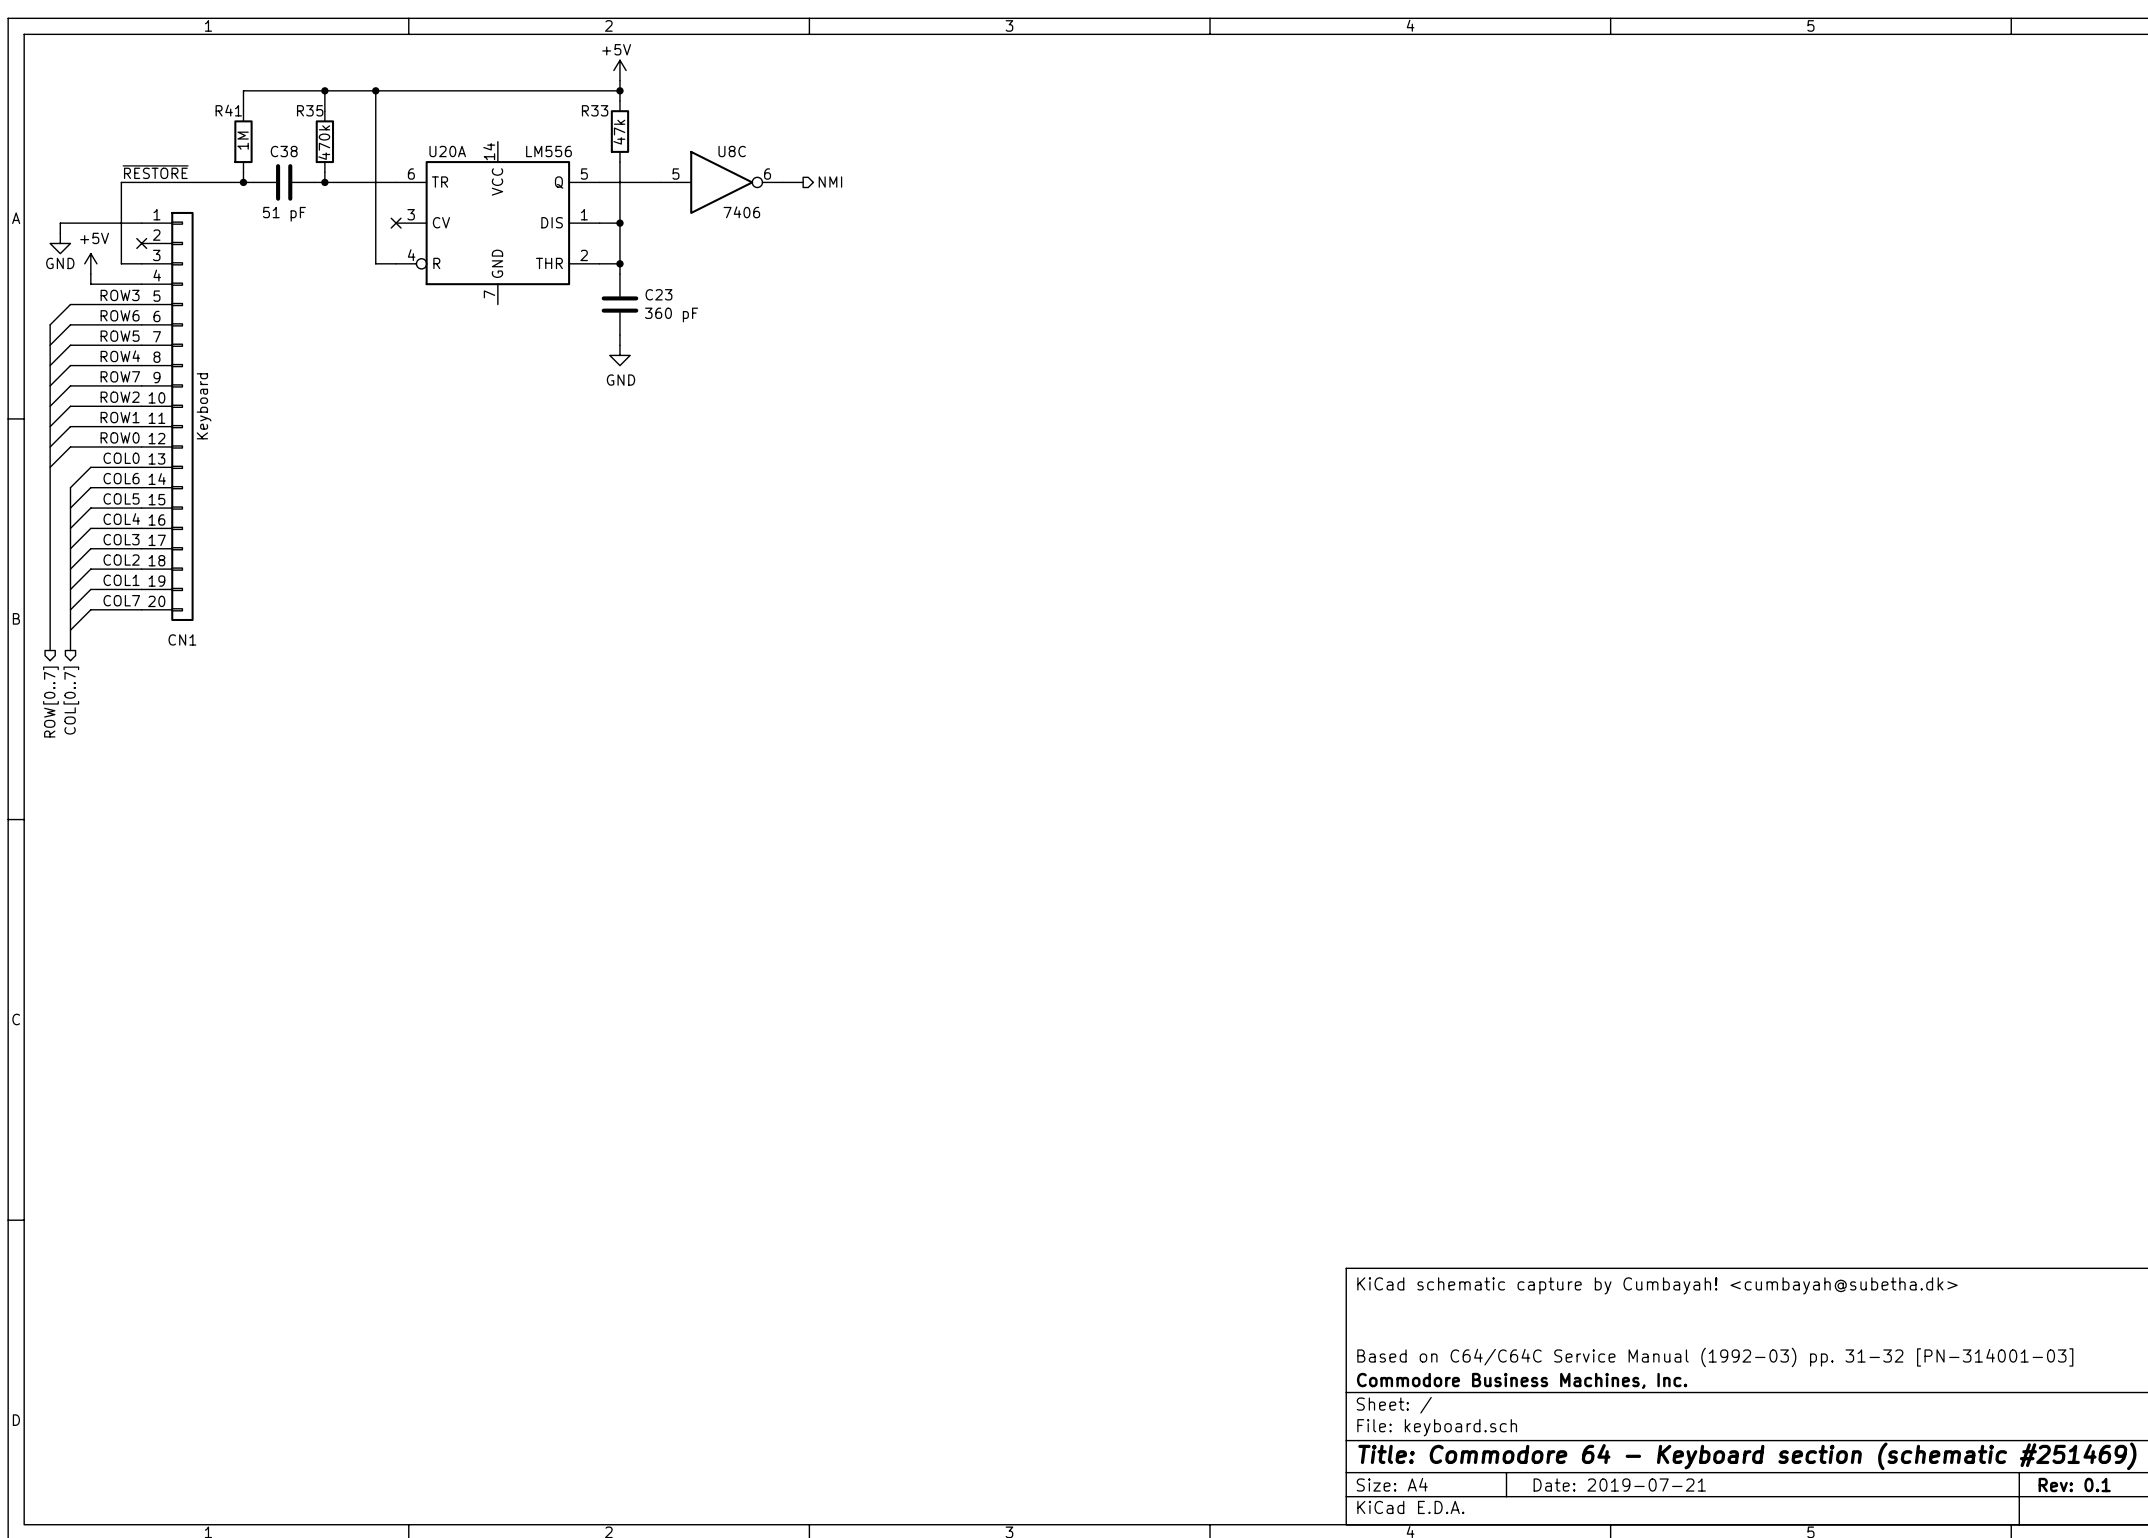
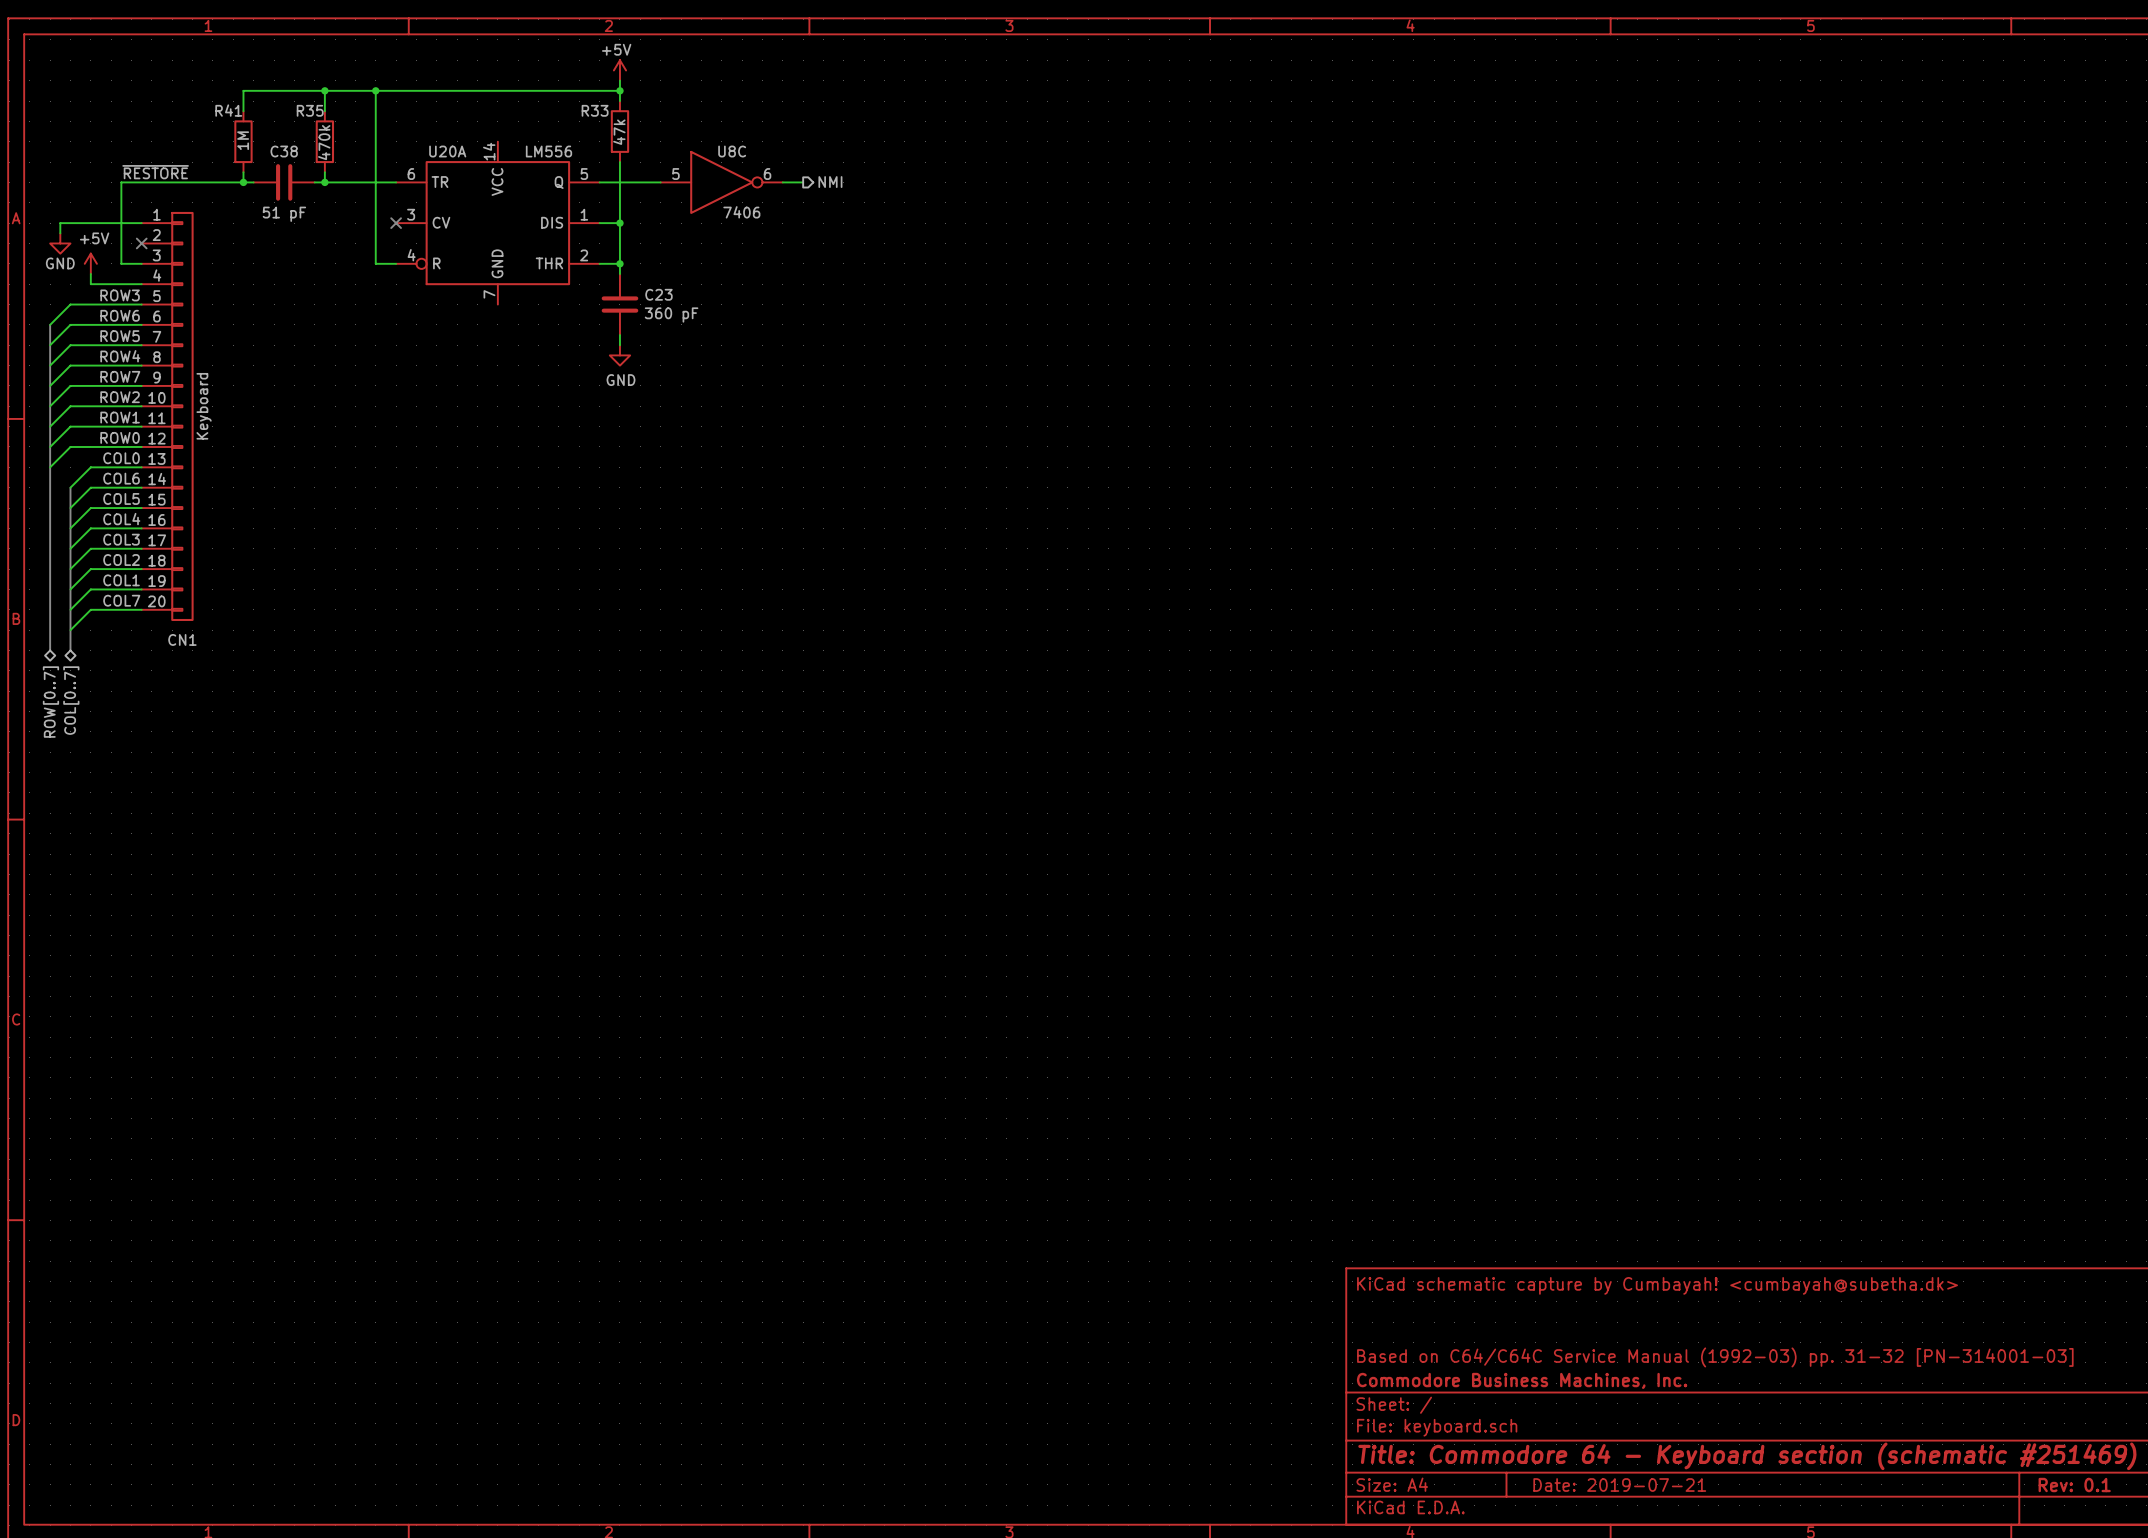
hierarchical label shape: output (71, 700) -> bidirectional (71, 700)
hierarchical label shape: output (50, 702) -> bidirectional (50, 702)

